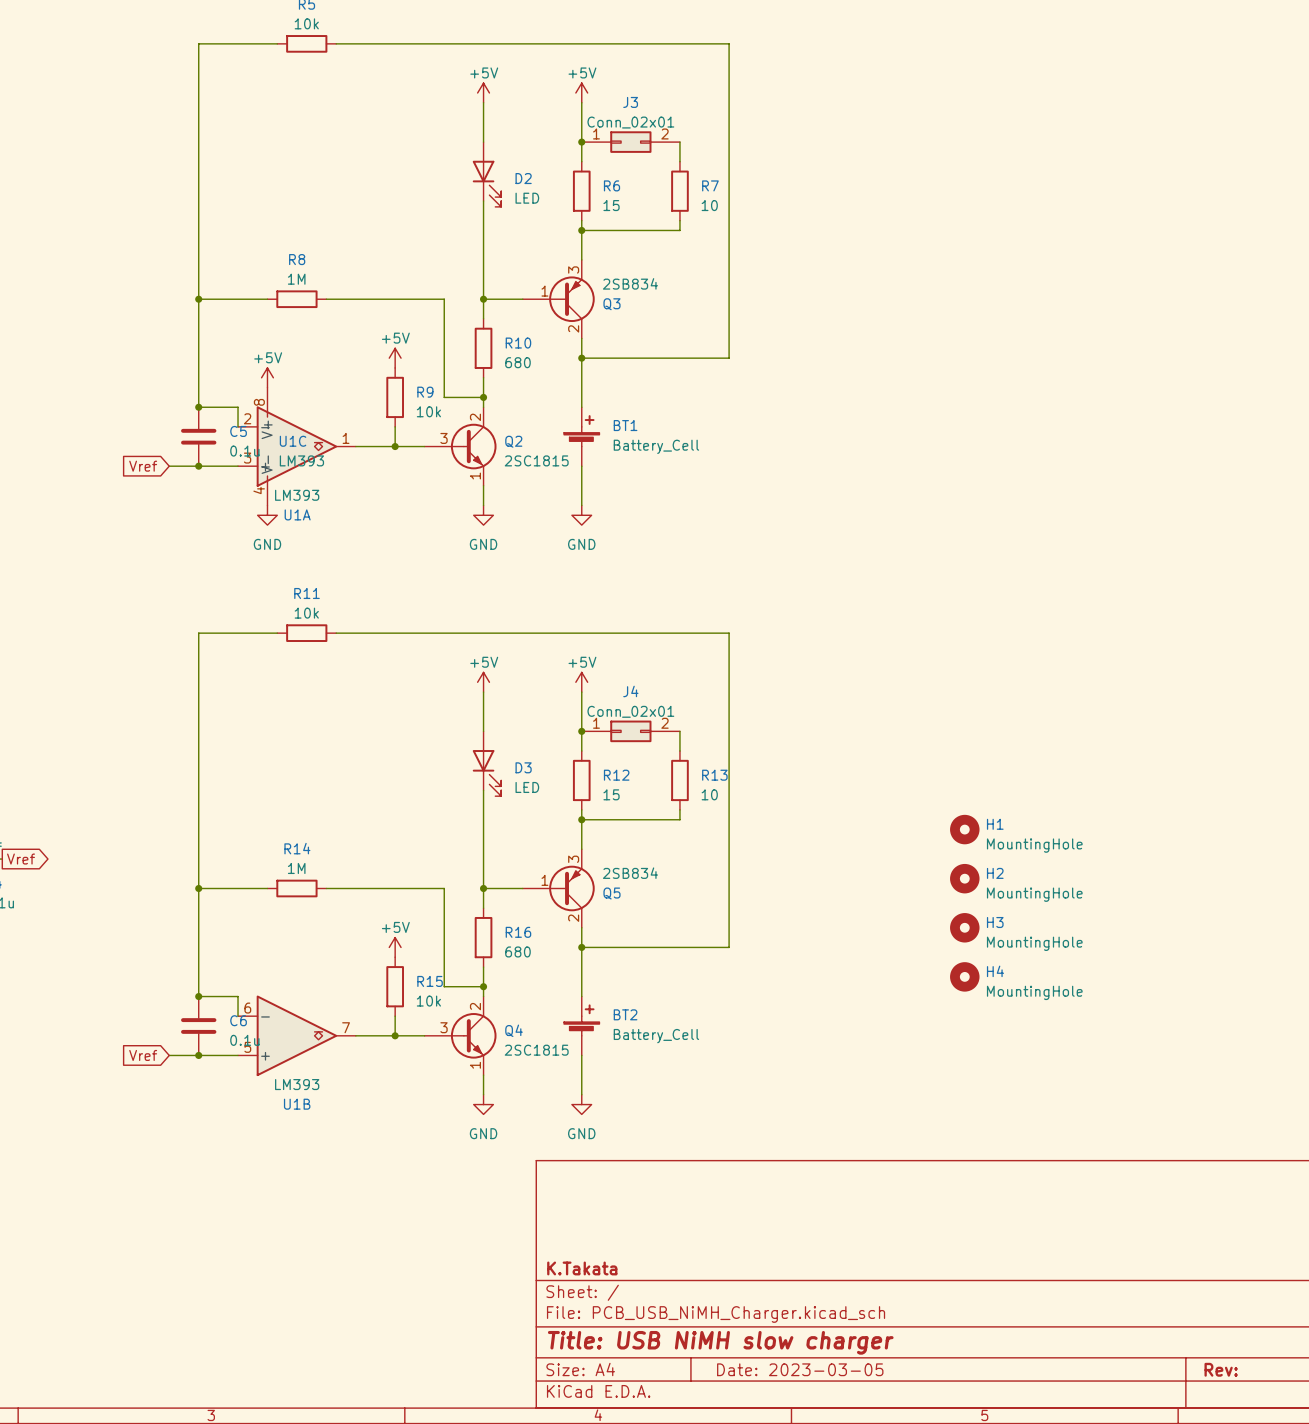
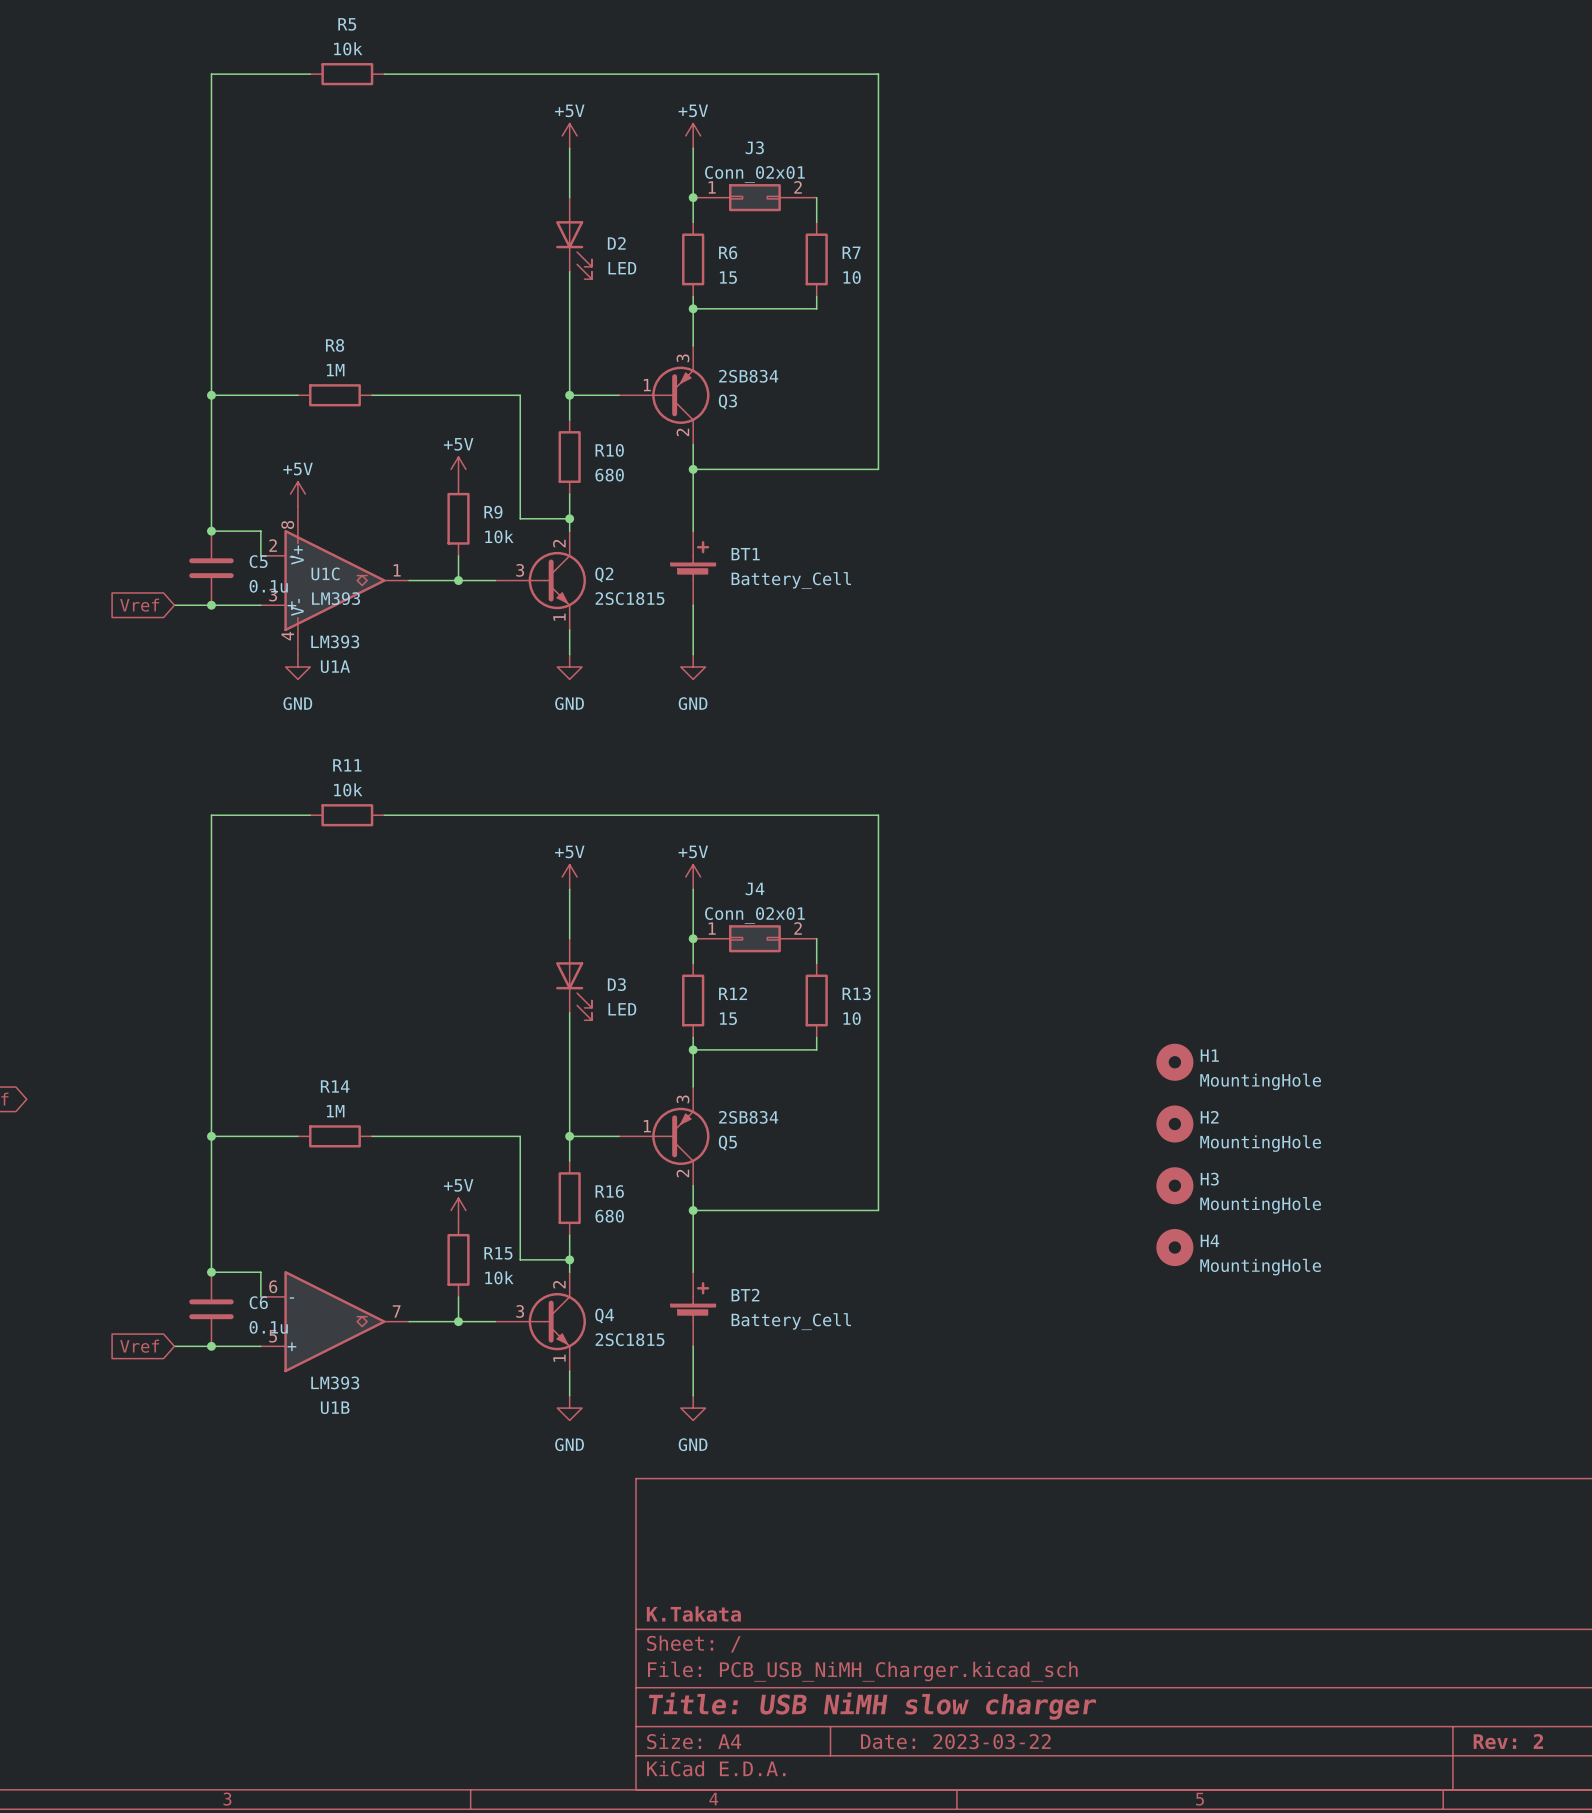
title block: Date: 2023-03-05 (800, 1369) -> Date: 2023-03-22 (955, 1741)
title block: Rev: (1221, 1369) -> Rev: 2 (1508, 1741)

